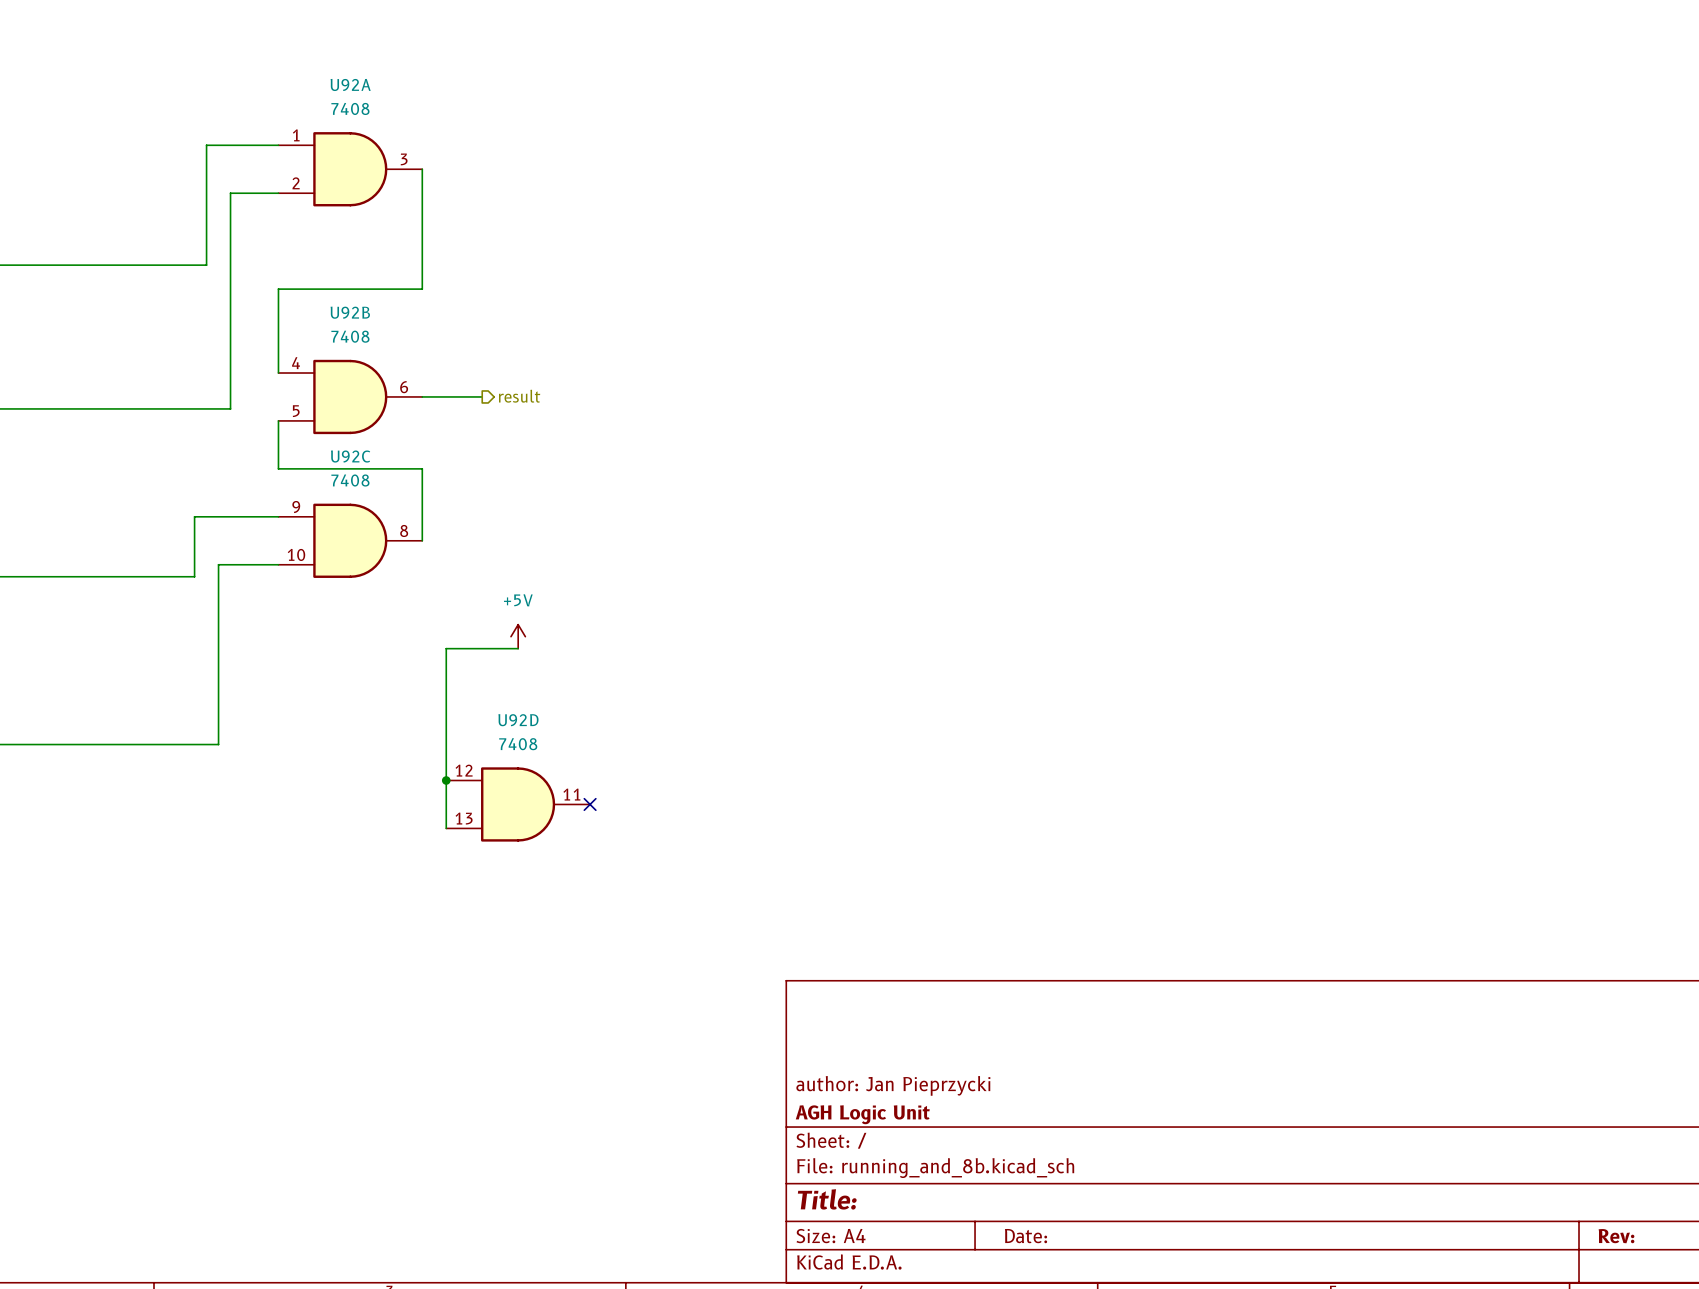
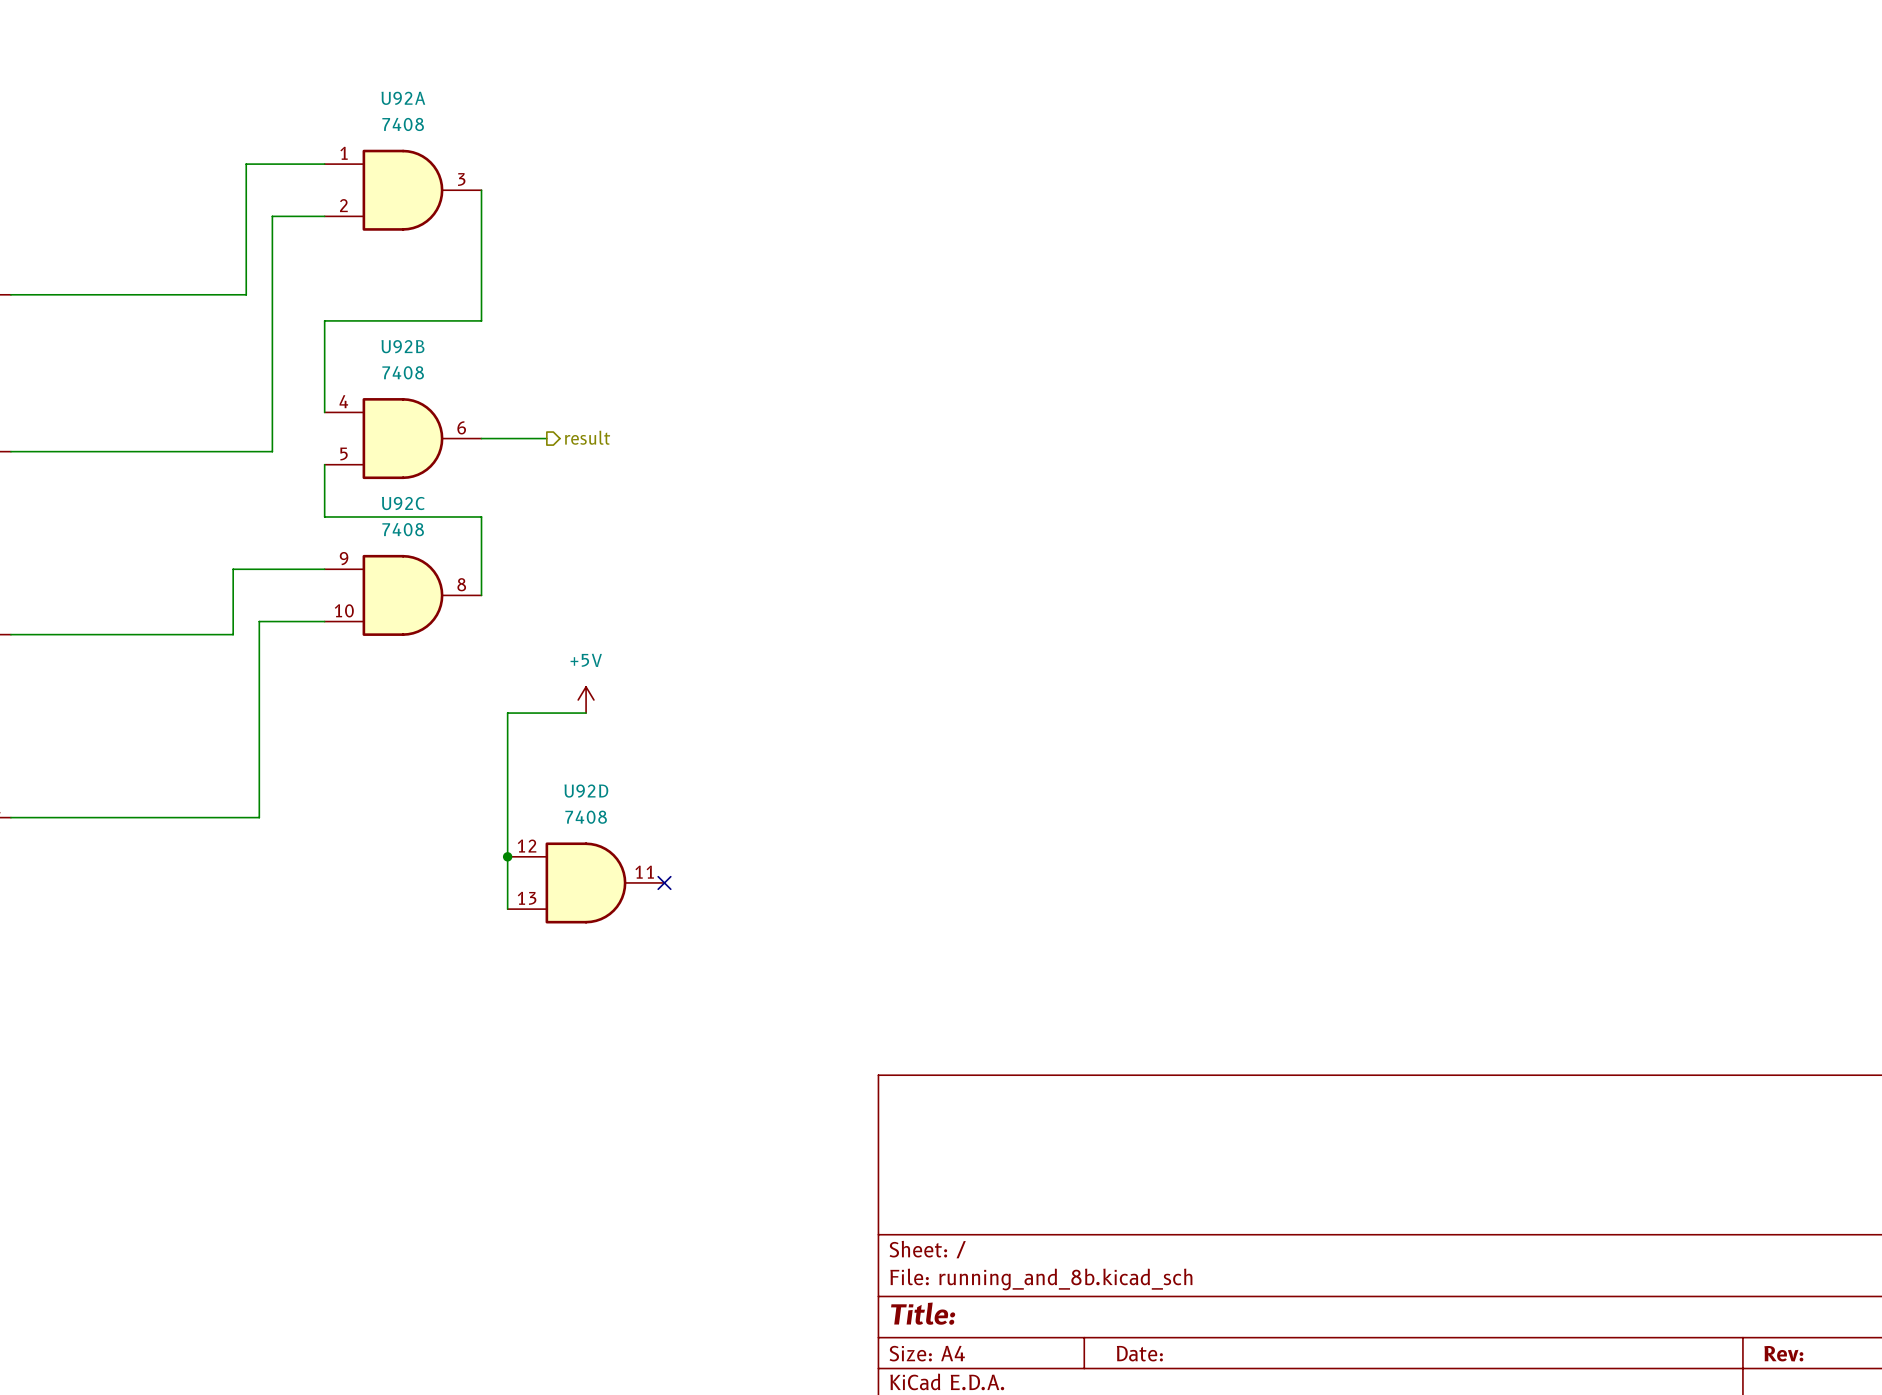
title block: author: Jan Pieprzycki (893, 1085) -> none
title block: AGH Logic Unit (862, 1114) -> none

